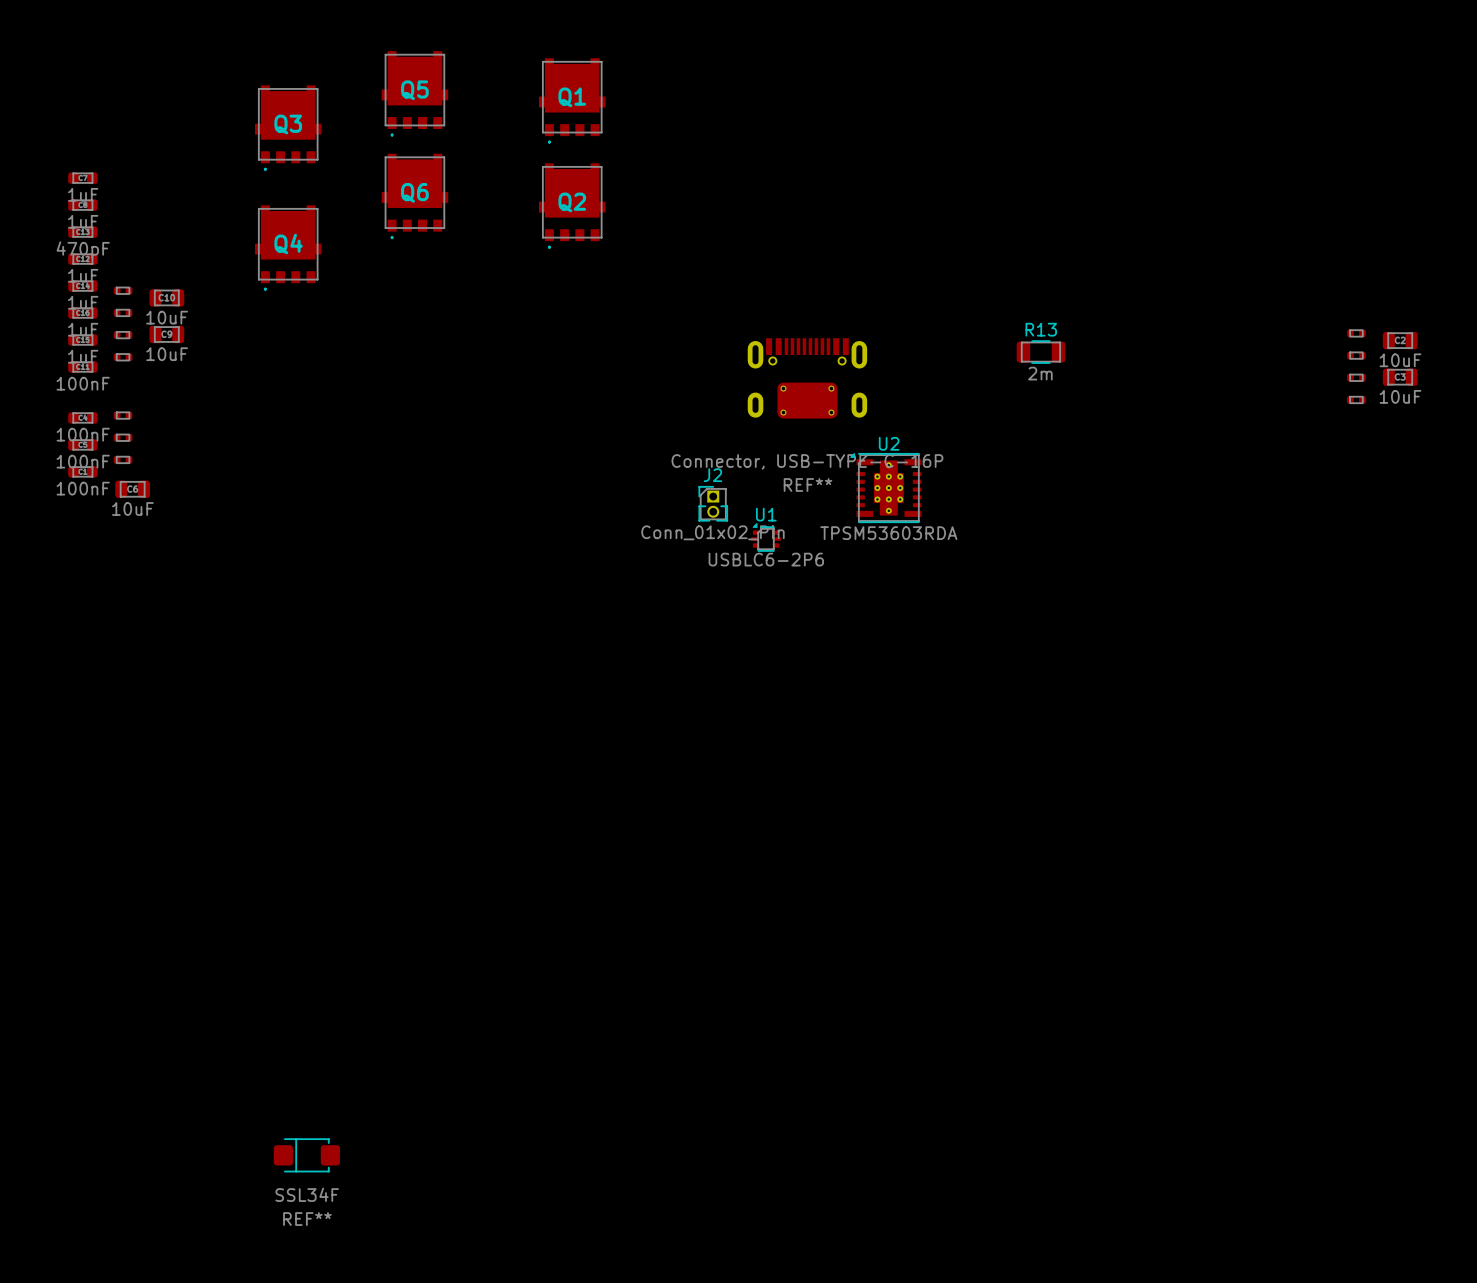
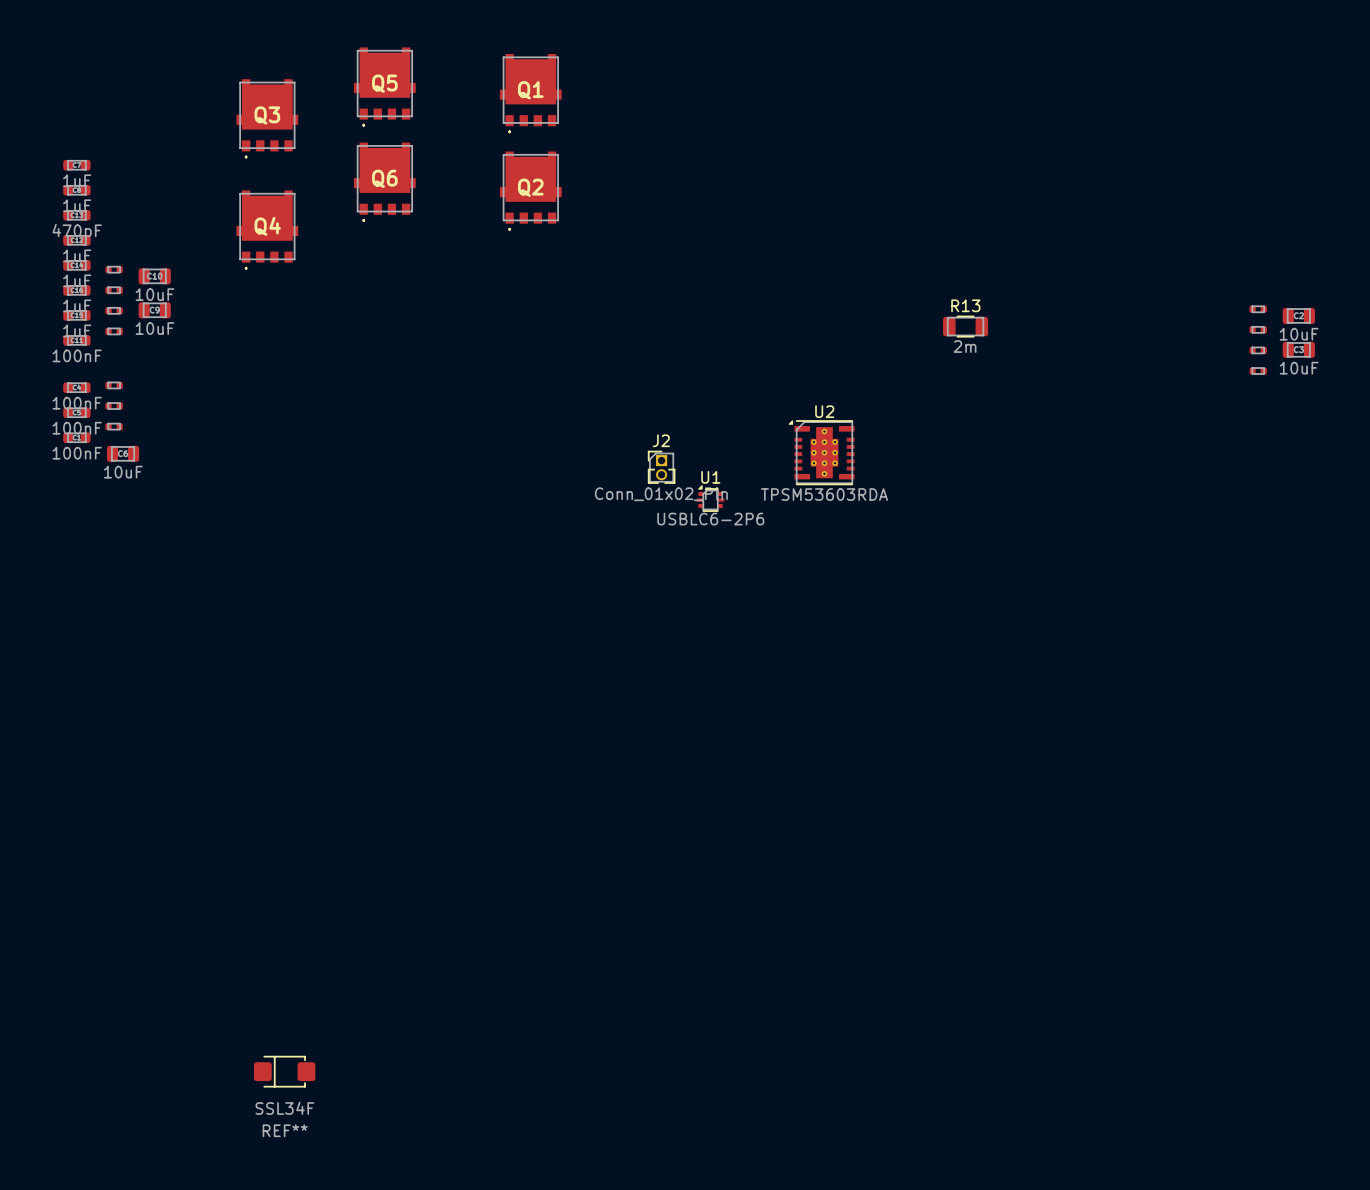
part: Connector, USB-TYPE-C-16P (807, 378) -> none

